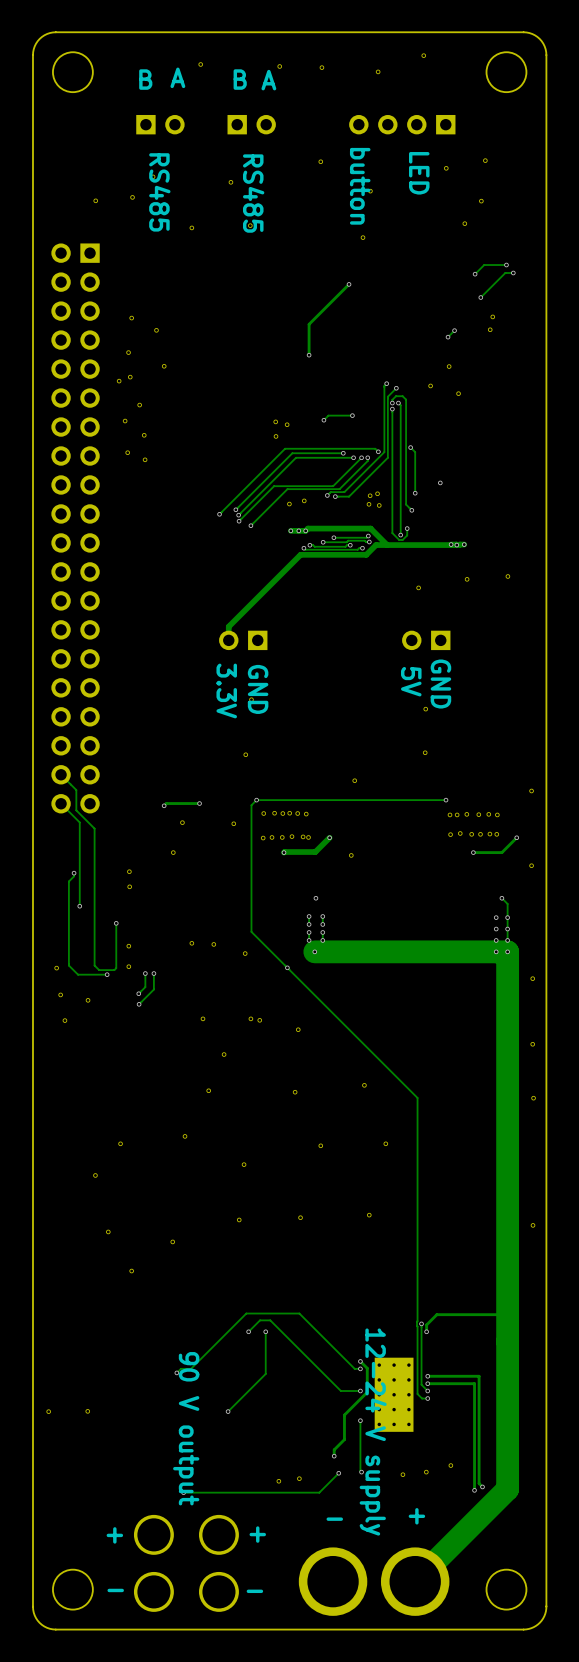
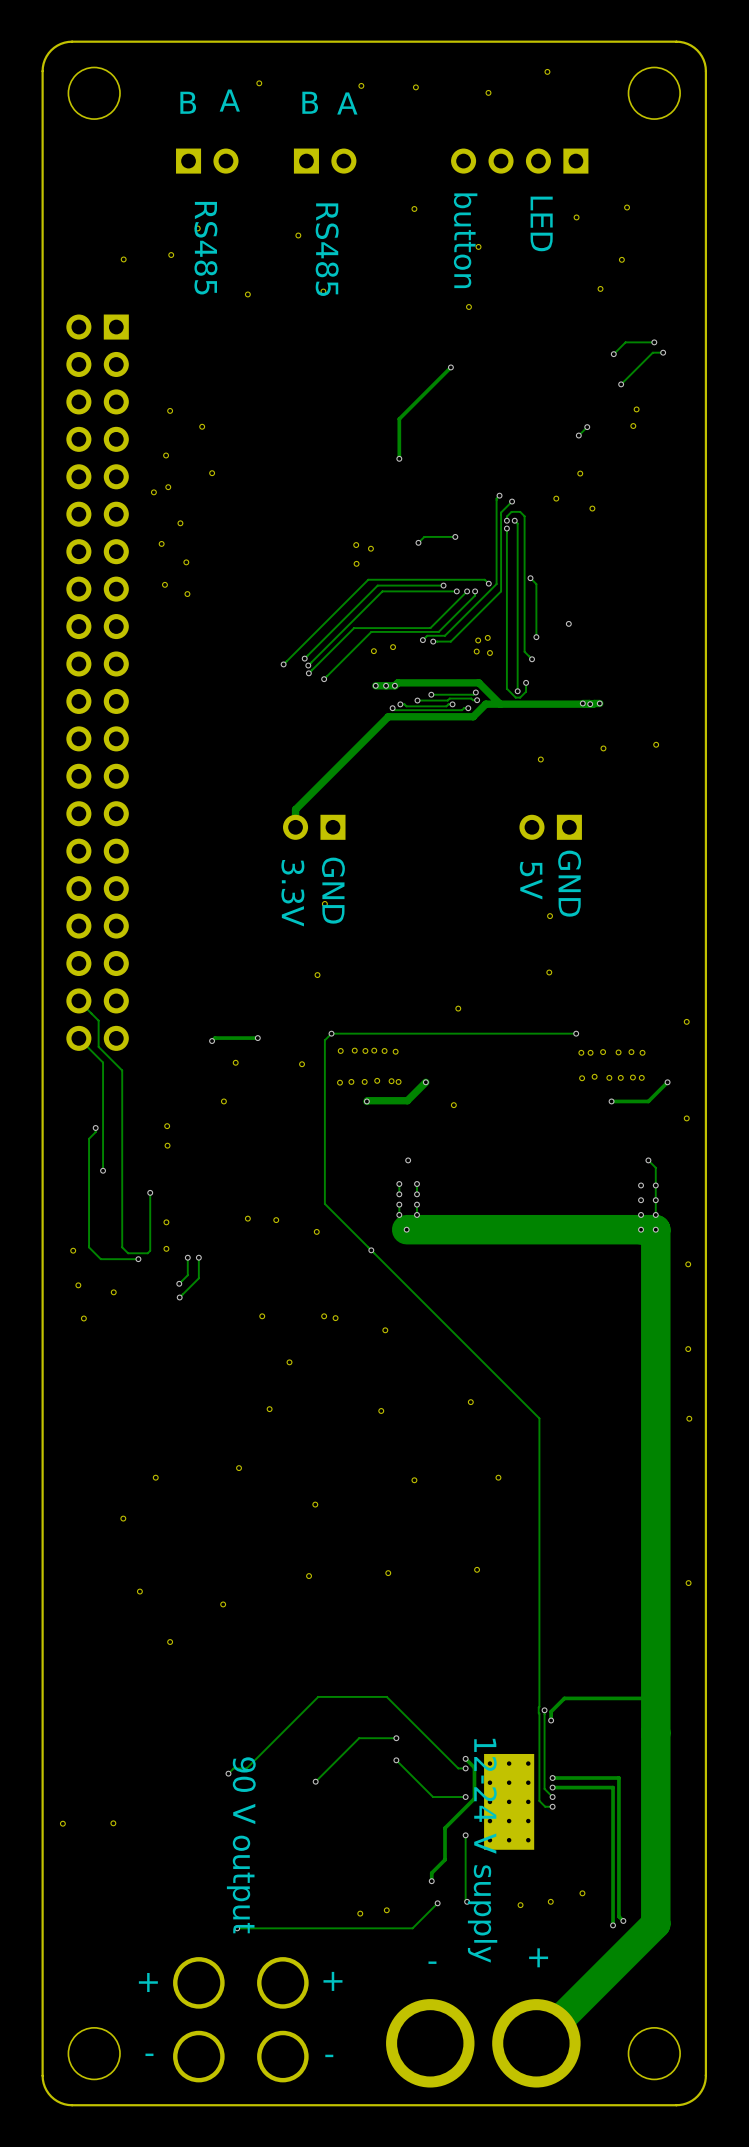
track: (248, 1331) (260, 1320) (270, 1320) (340, 1391) -> (396, 1760) (433, 1797) (440, 1797)
via: (248, 1331) -> none
track: (265, 1331) (265, 1373) (228, 1411) -> none
via: (265, 1331) -> none
track: none -> (396, 1738) (359, 1738) (315, 1781)
via: none -> (396, 1738)
via: none -> (396, 1760)
via: none -> (315, 1781)
via: (228, 1411) -> none

